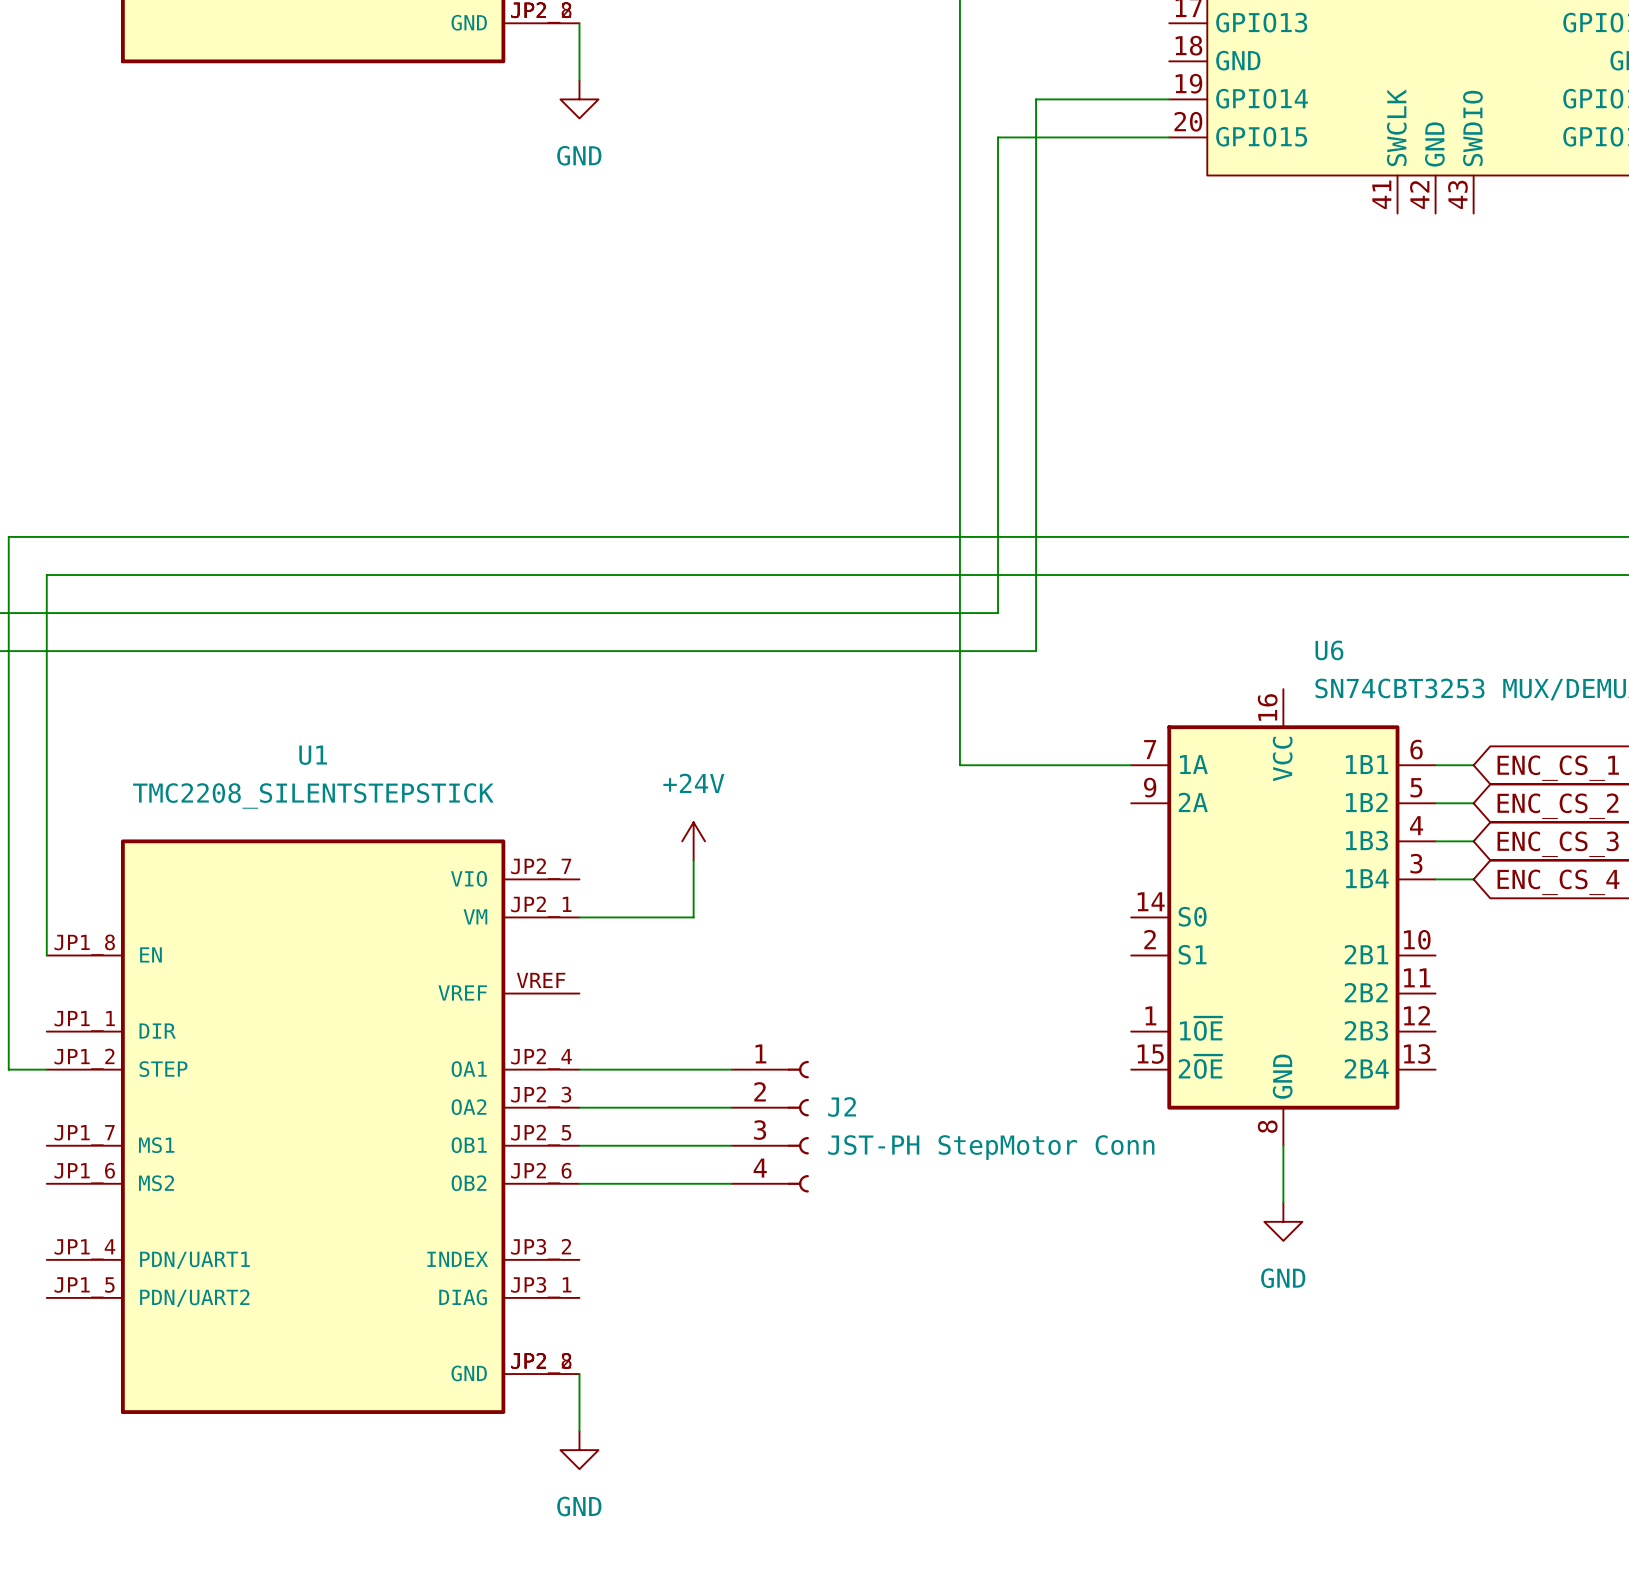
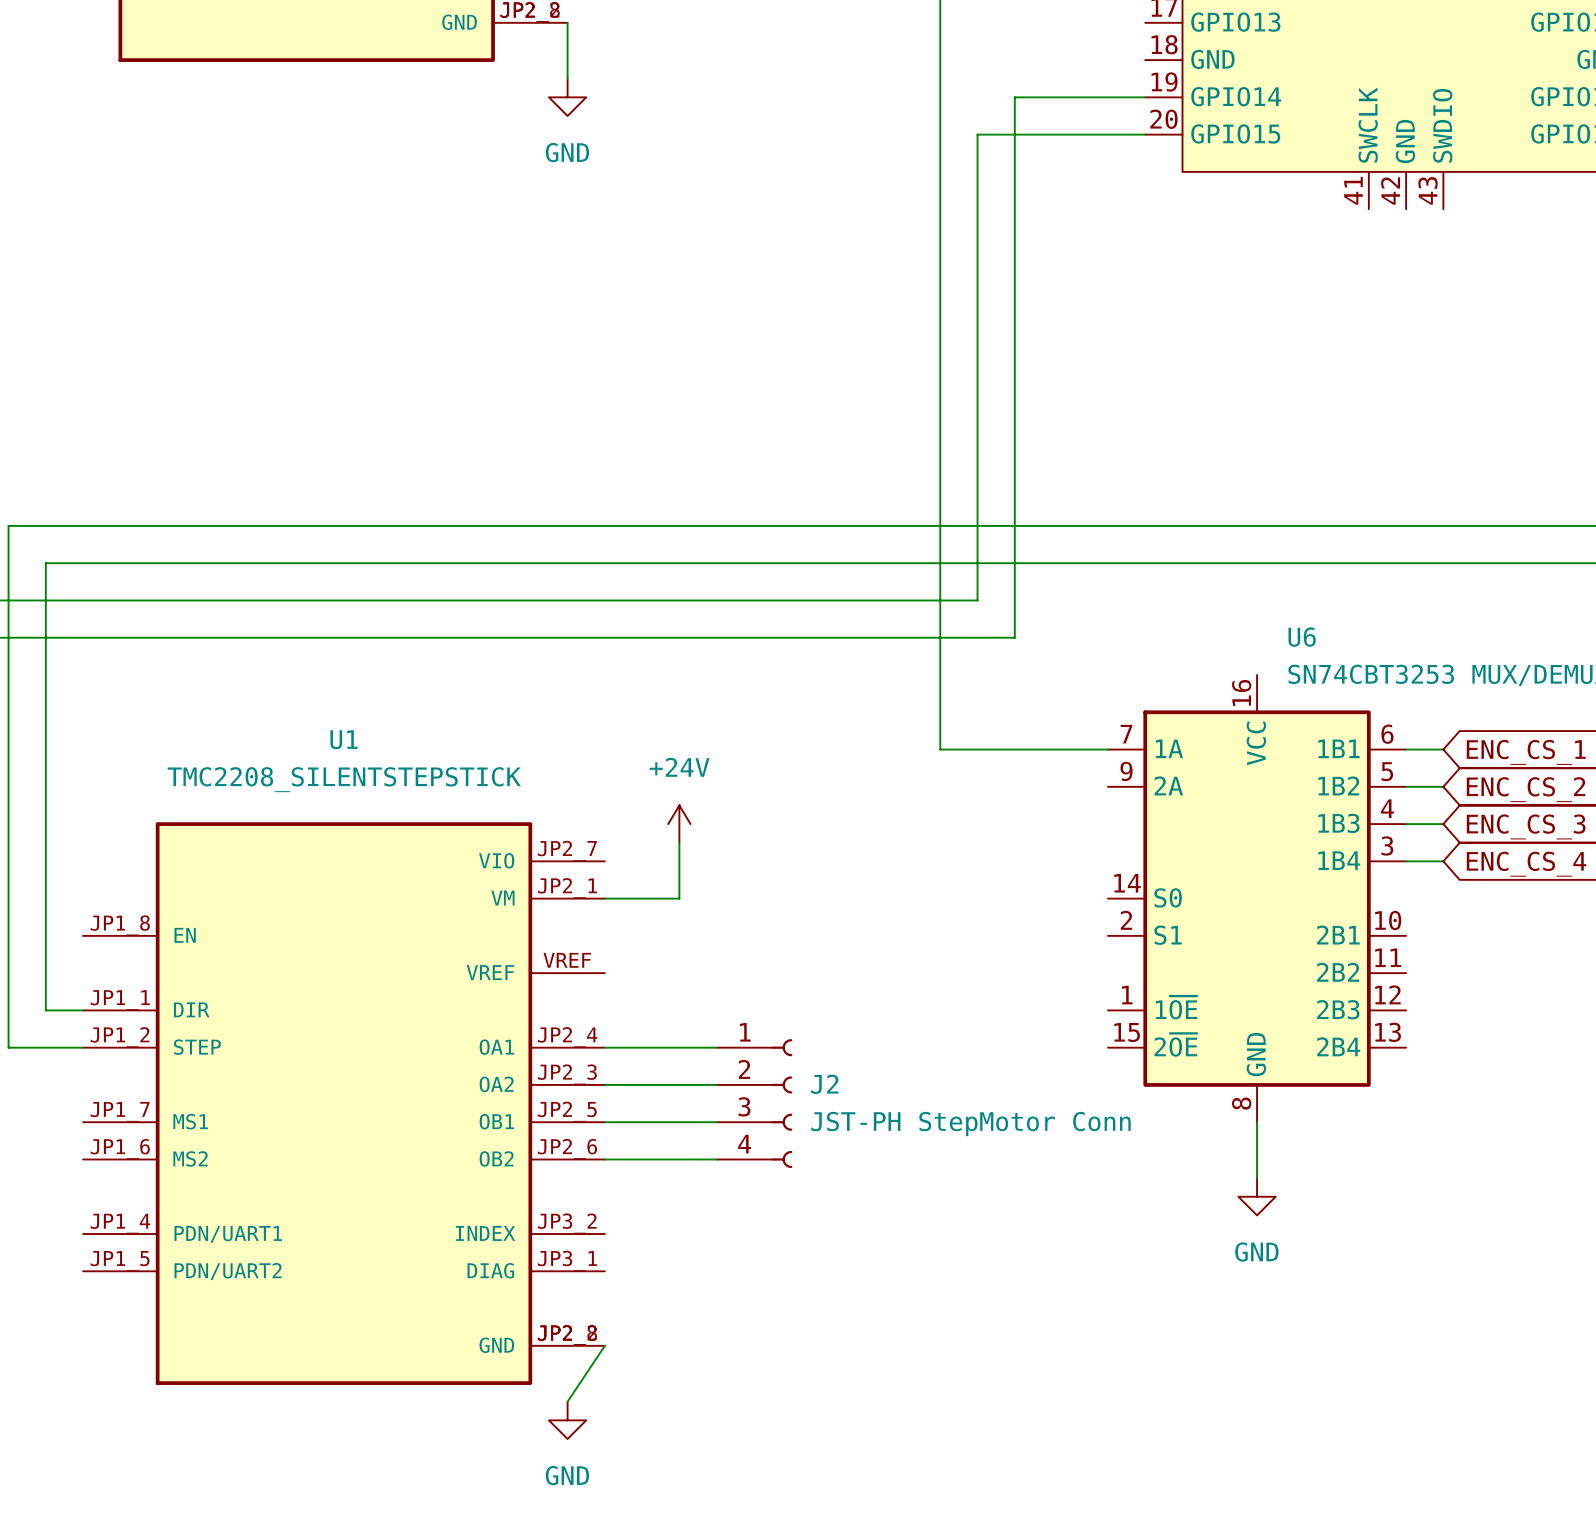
wire: none -> (45, 935) (45, 1010) (83, 1010)
U1 position: (313, 1126) -> (343, 1103)
wire: (579, 1374) (579, 1431) -> (604, 1345) (567, 1401)

